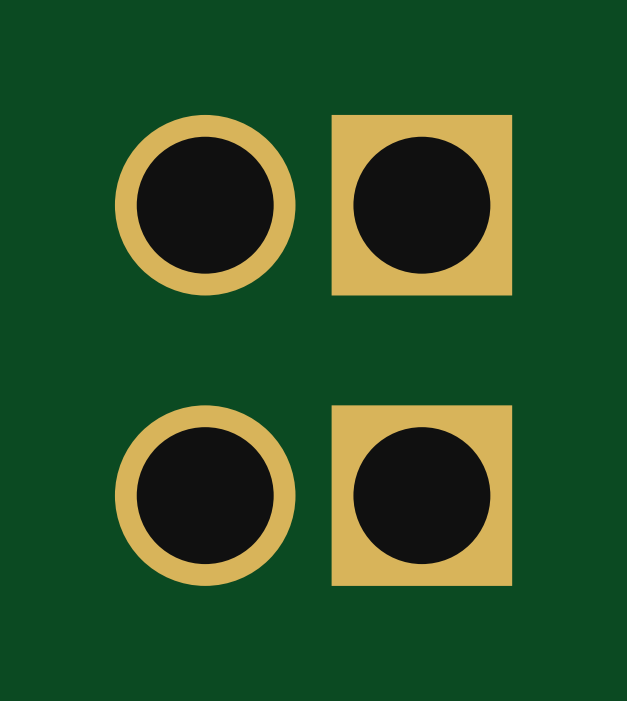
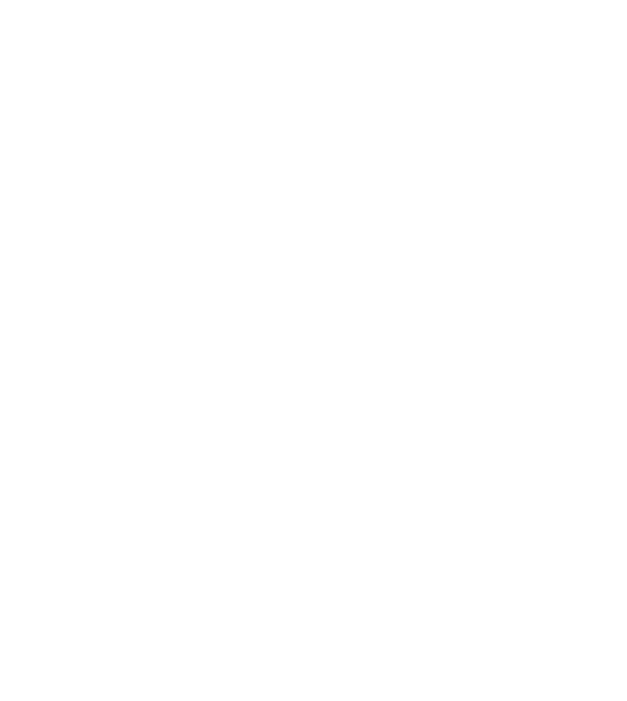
part: (313, 205) -> none
part: (313, 495) -> none

